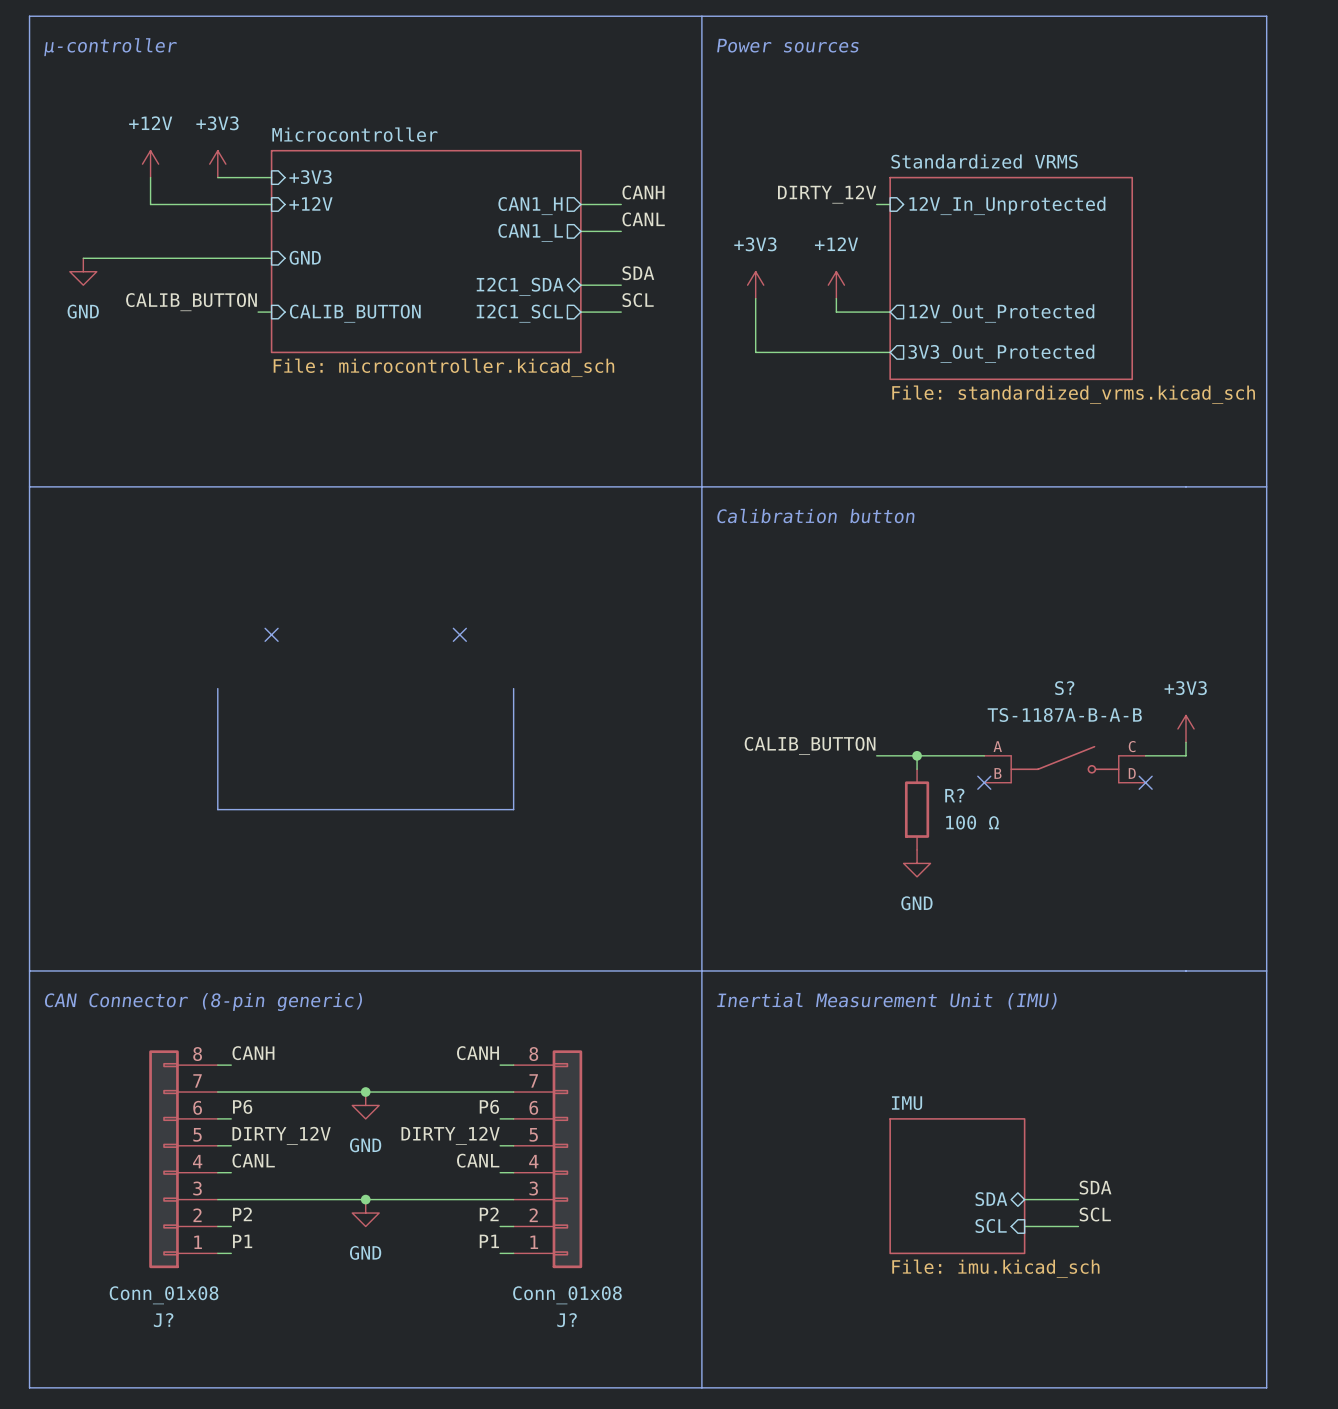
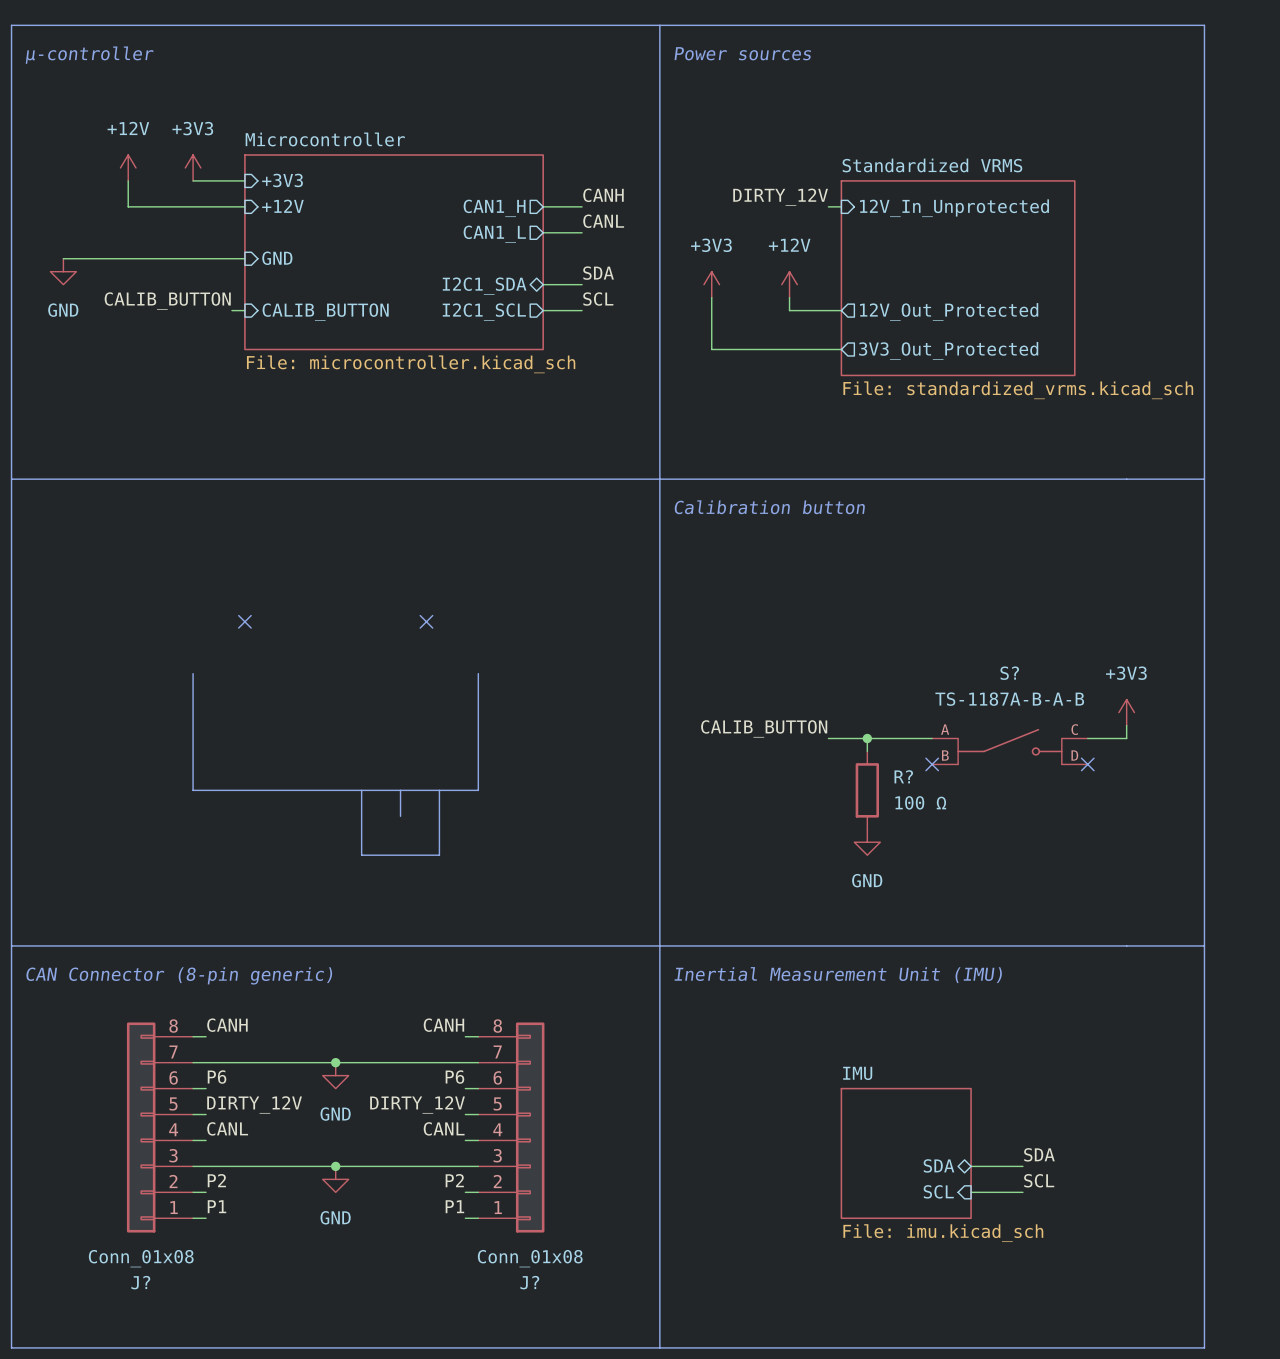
line: none -> (361, 790) (361, 855) (439, 855) (439, 790)
line: none -> (400, 790) (400, 816)

